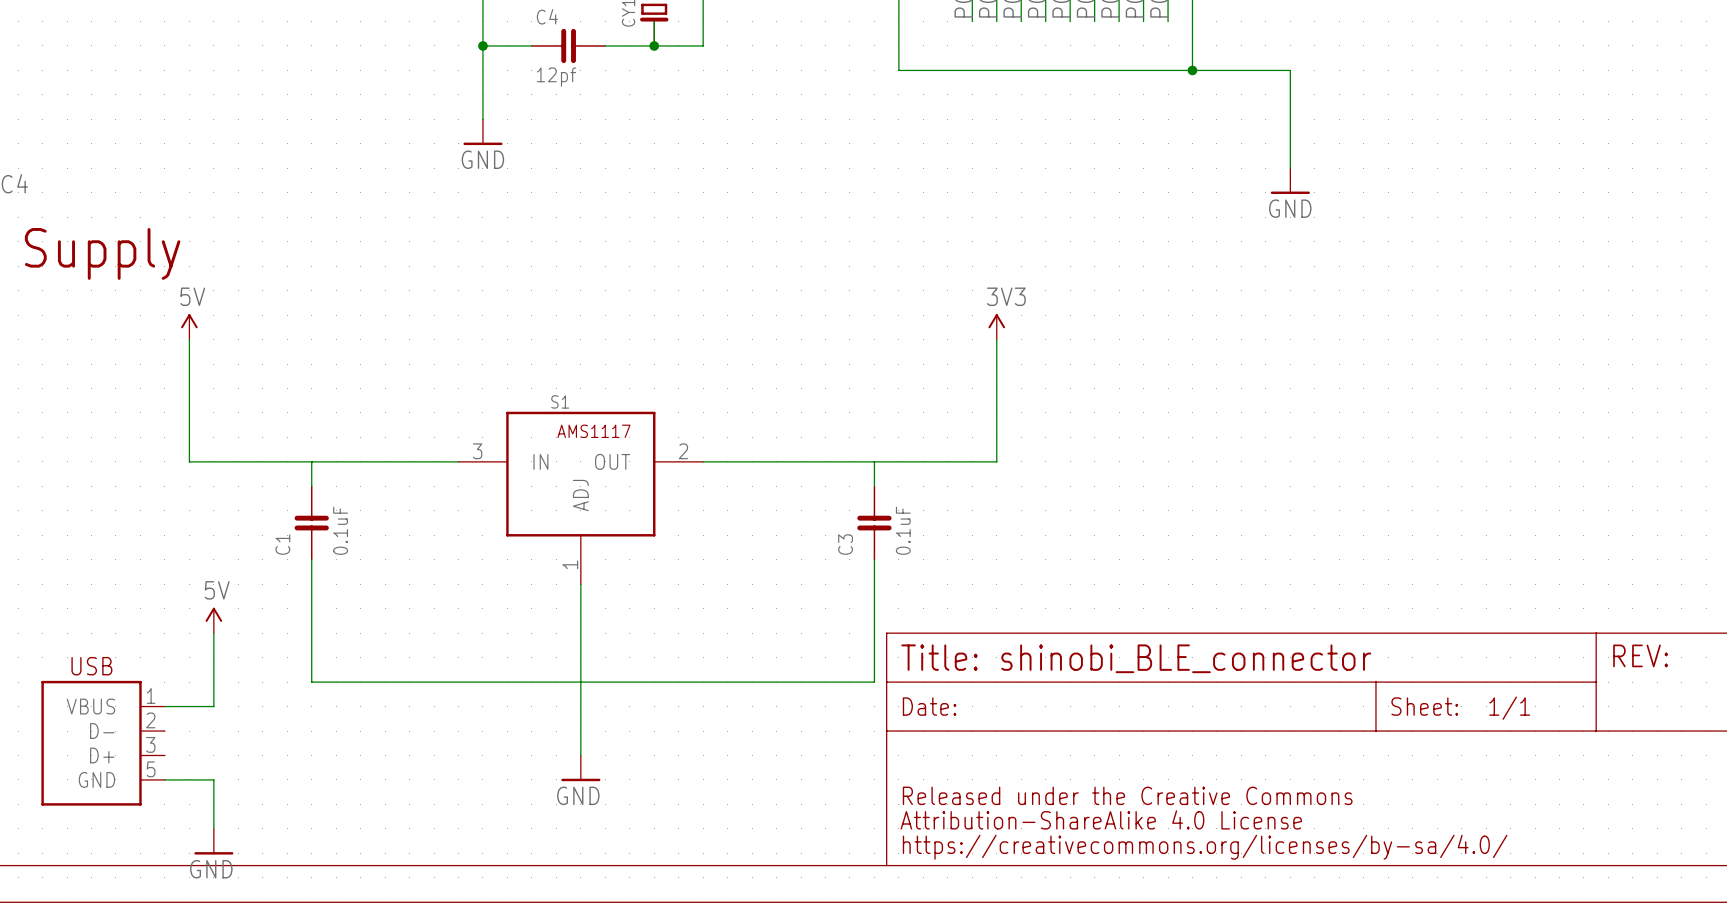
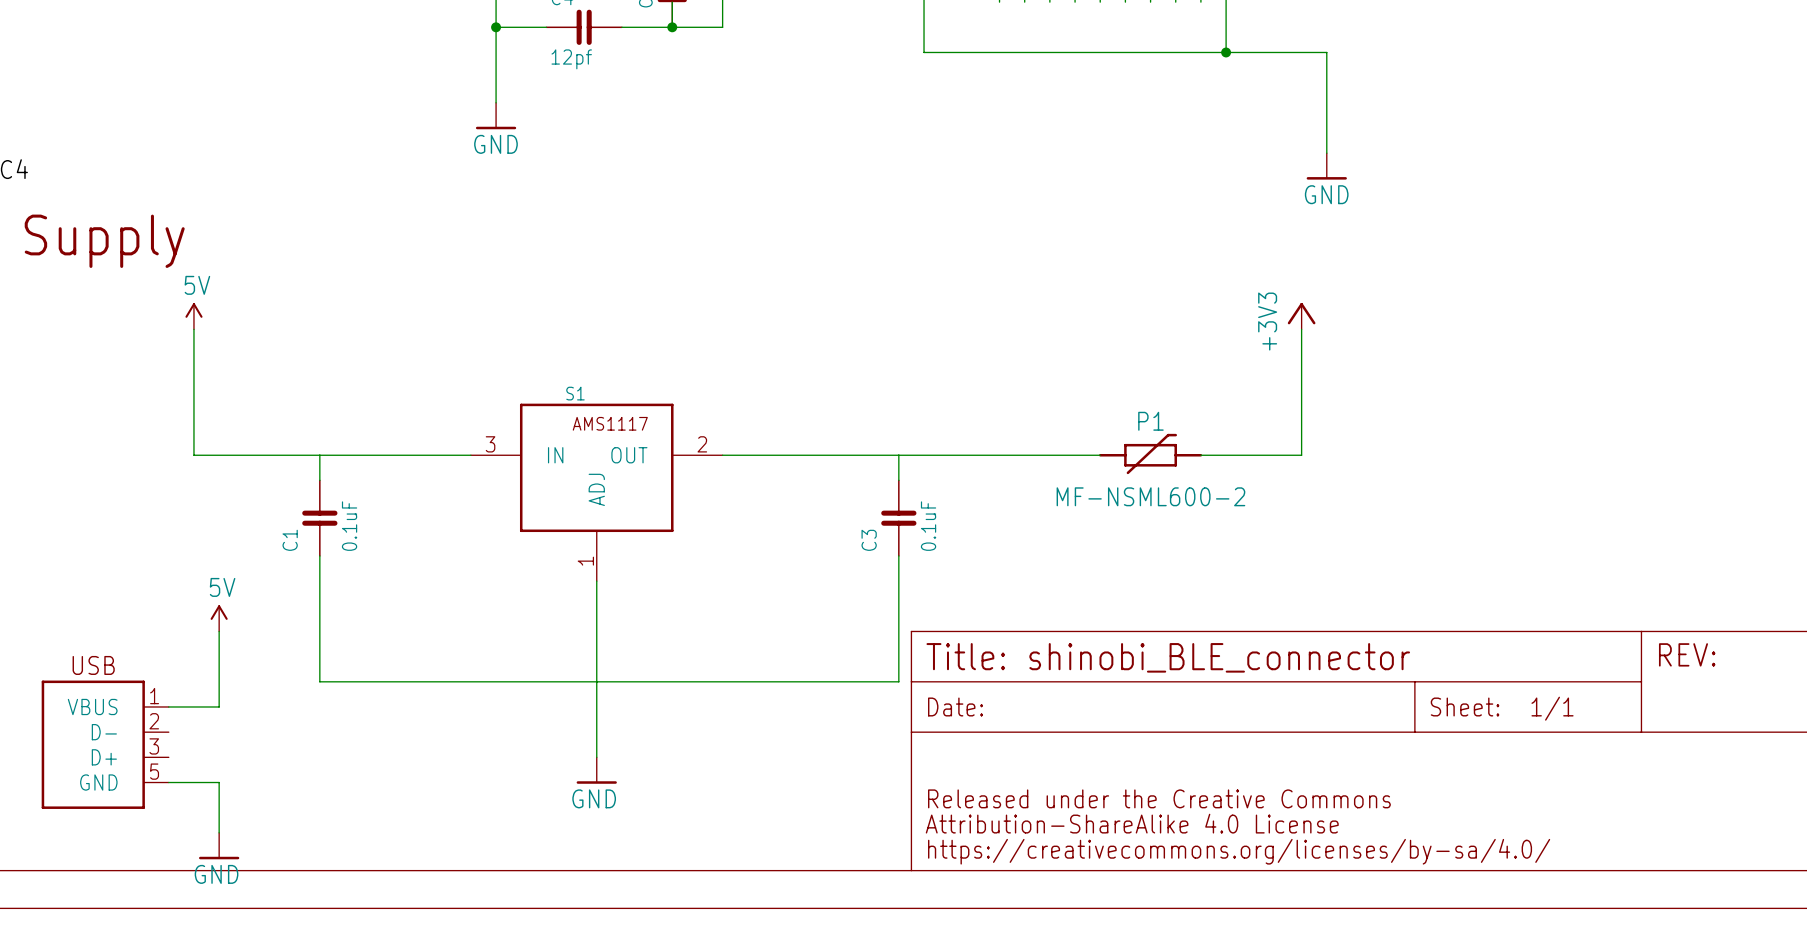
power symbol: 3V3 (996, 326) -> none
power symbol: none -> +3V3 (1301, 316)
wire: (996, 339) (996, 461) -> (1100, 455) (1024, 455)
wire: none -> (1301, 329) (1301, 455) (1200, 455)
P1: none -> MF-NSML600-2 (1150, 454)

